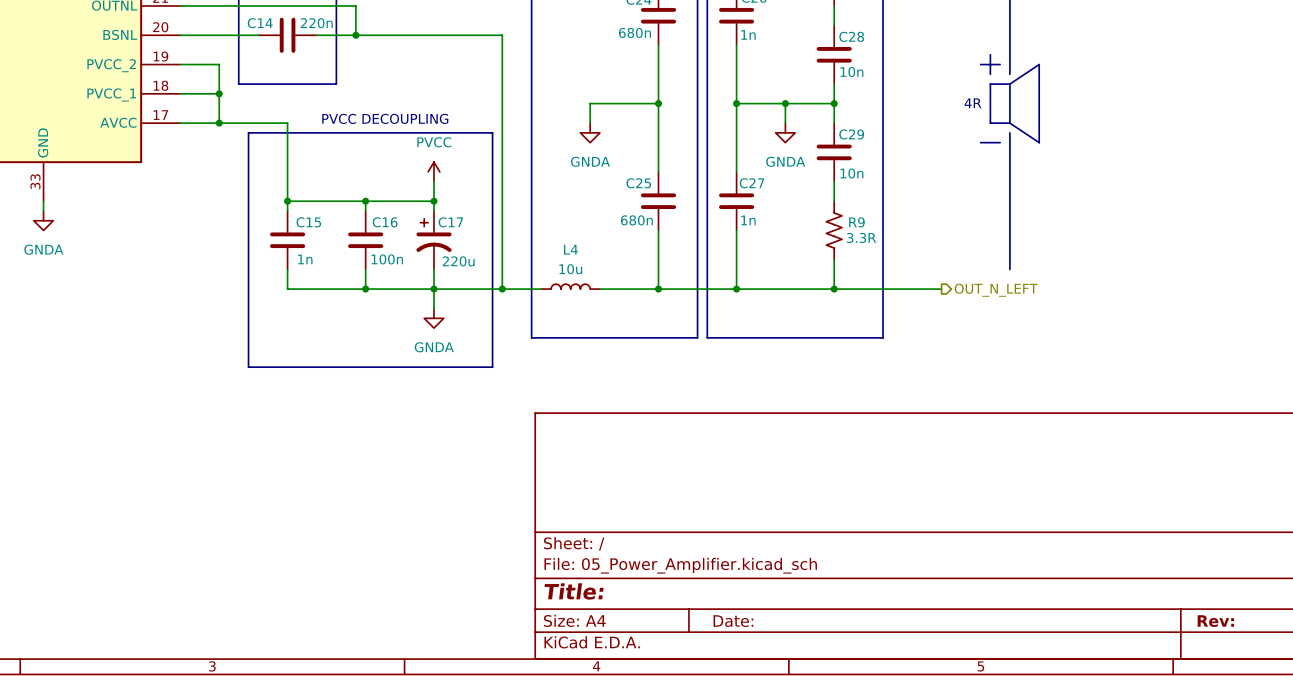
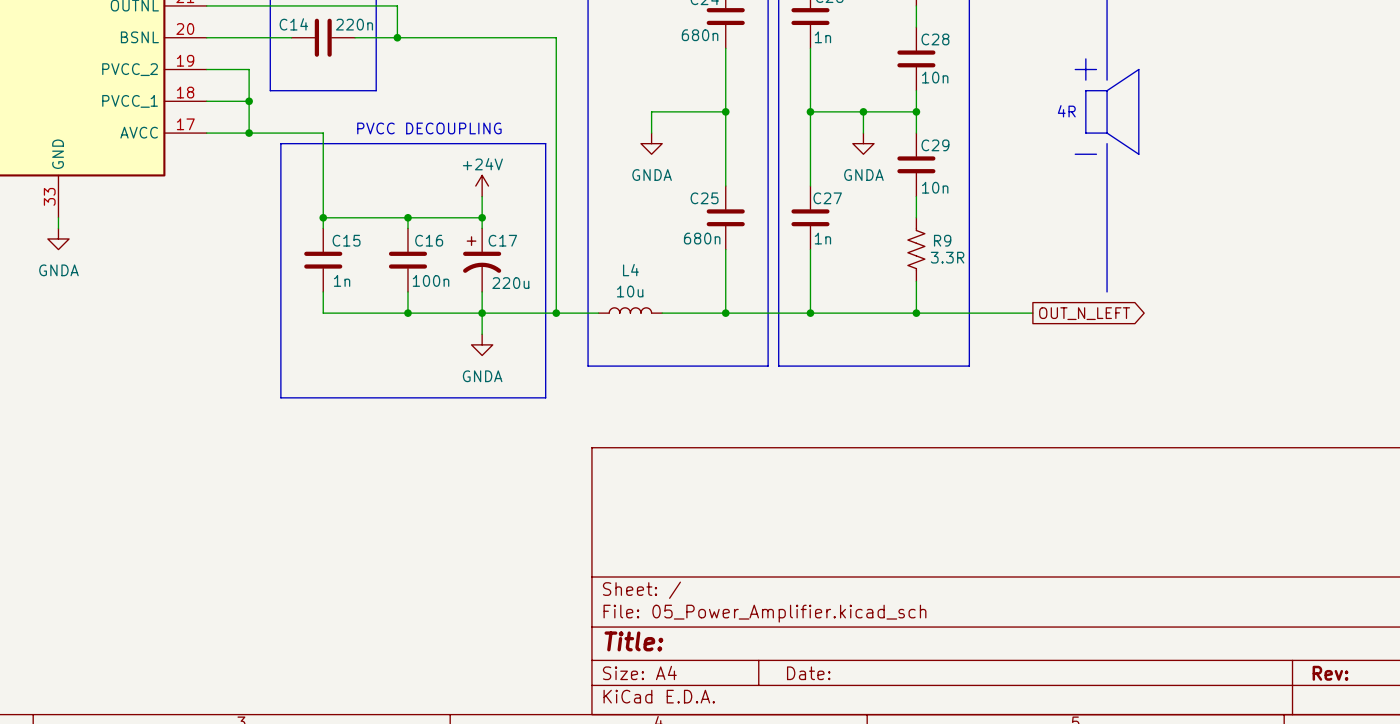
power symbol: PVCC (433, 171) -> +24V (482, 186)
global label: none -> OUT_N_LEFT (1084, 313)
hierarchical label: OUT_N_LEFT (996, 290) -> none

